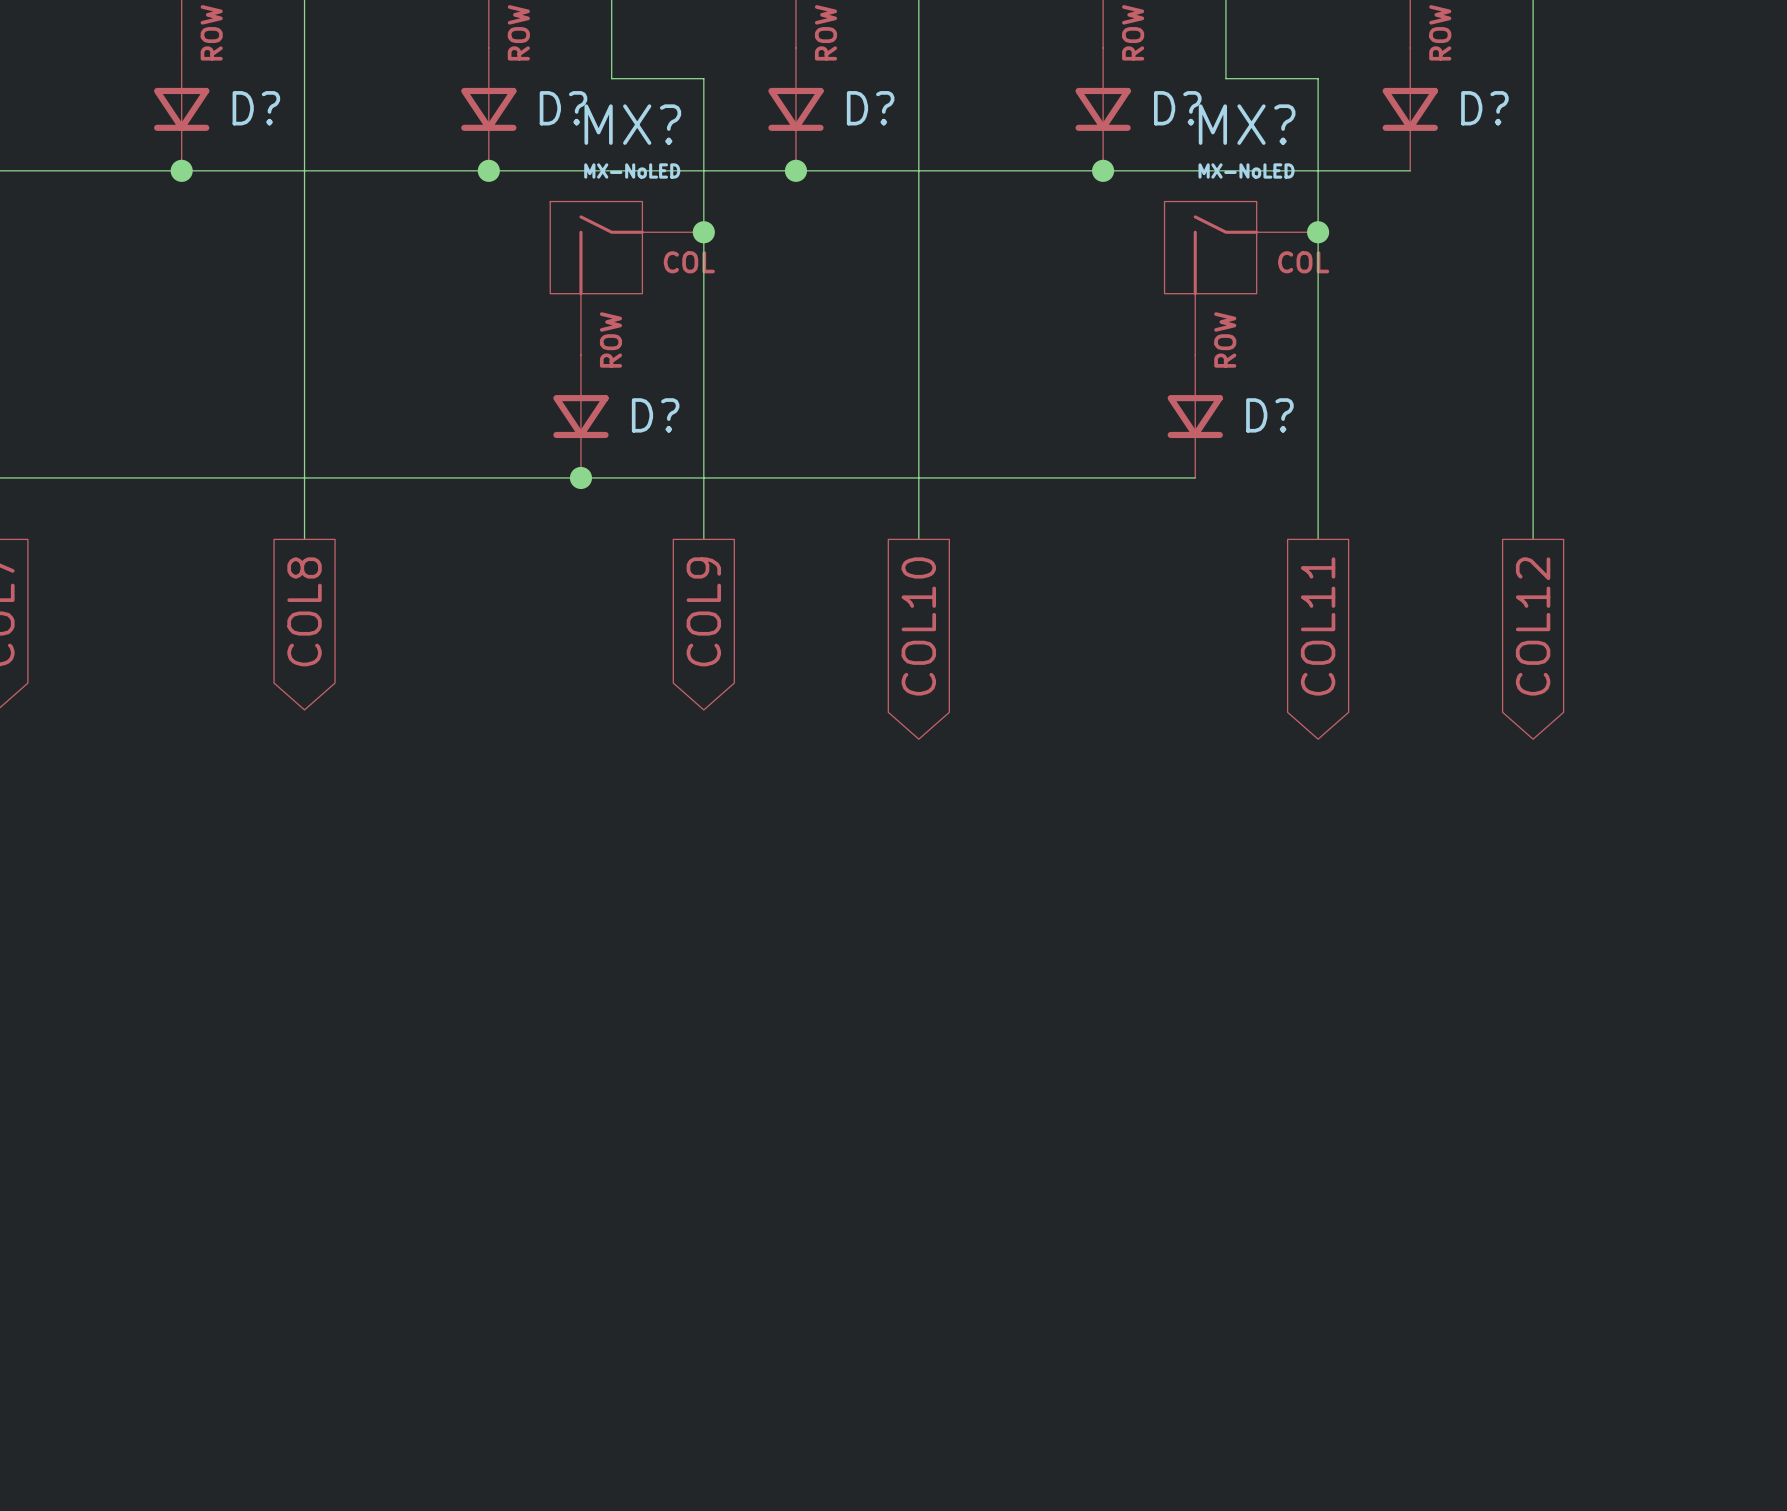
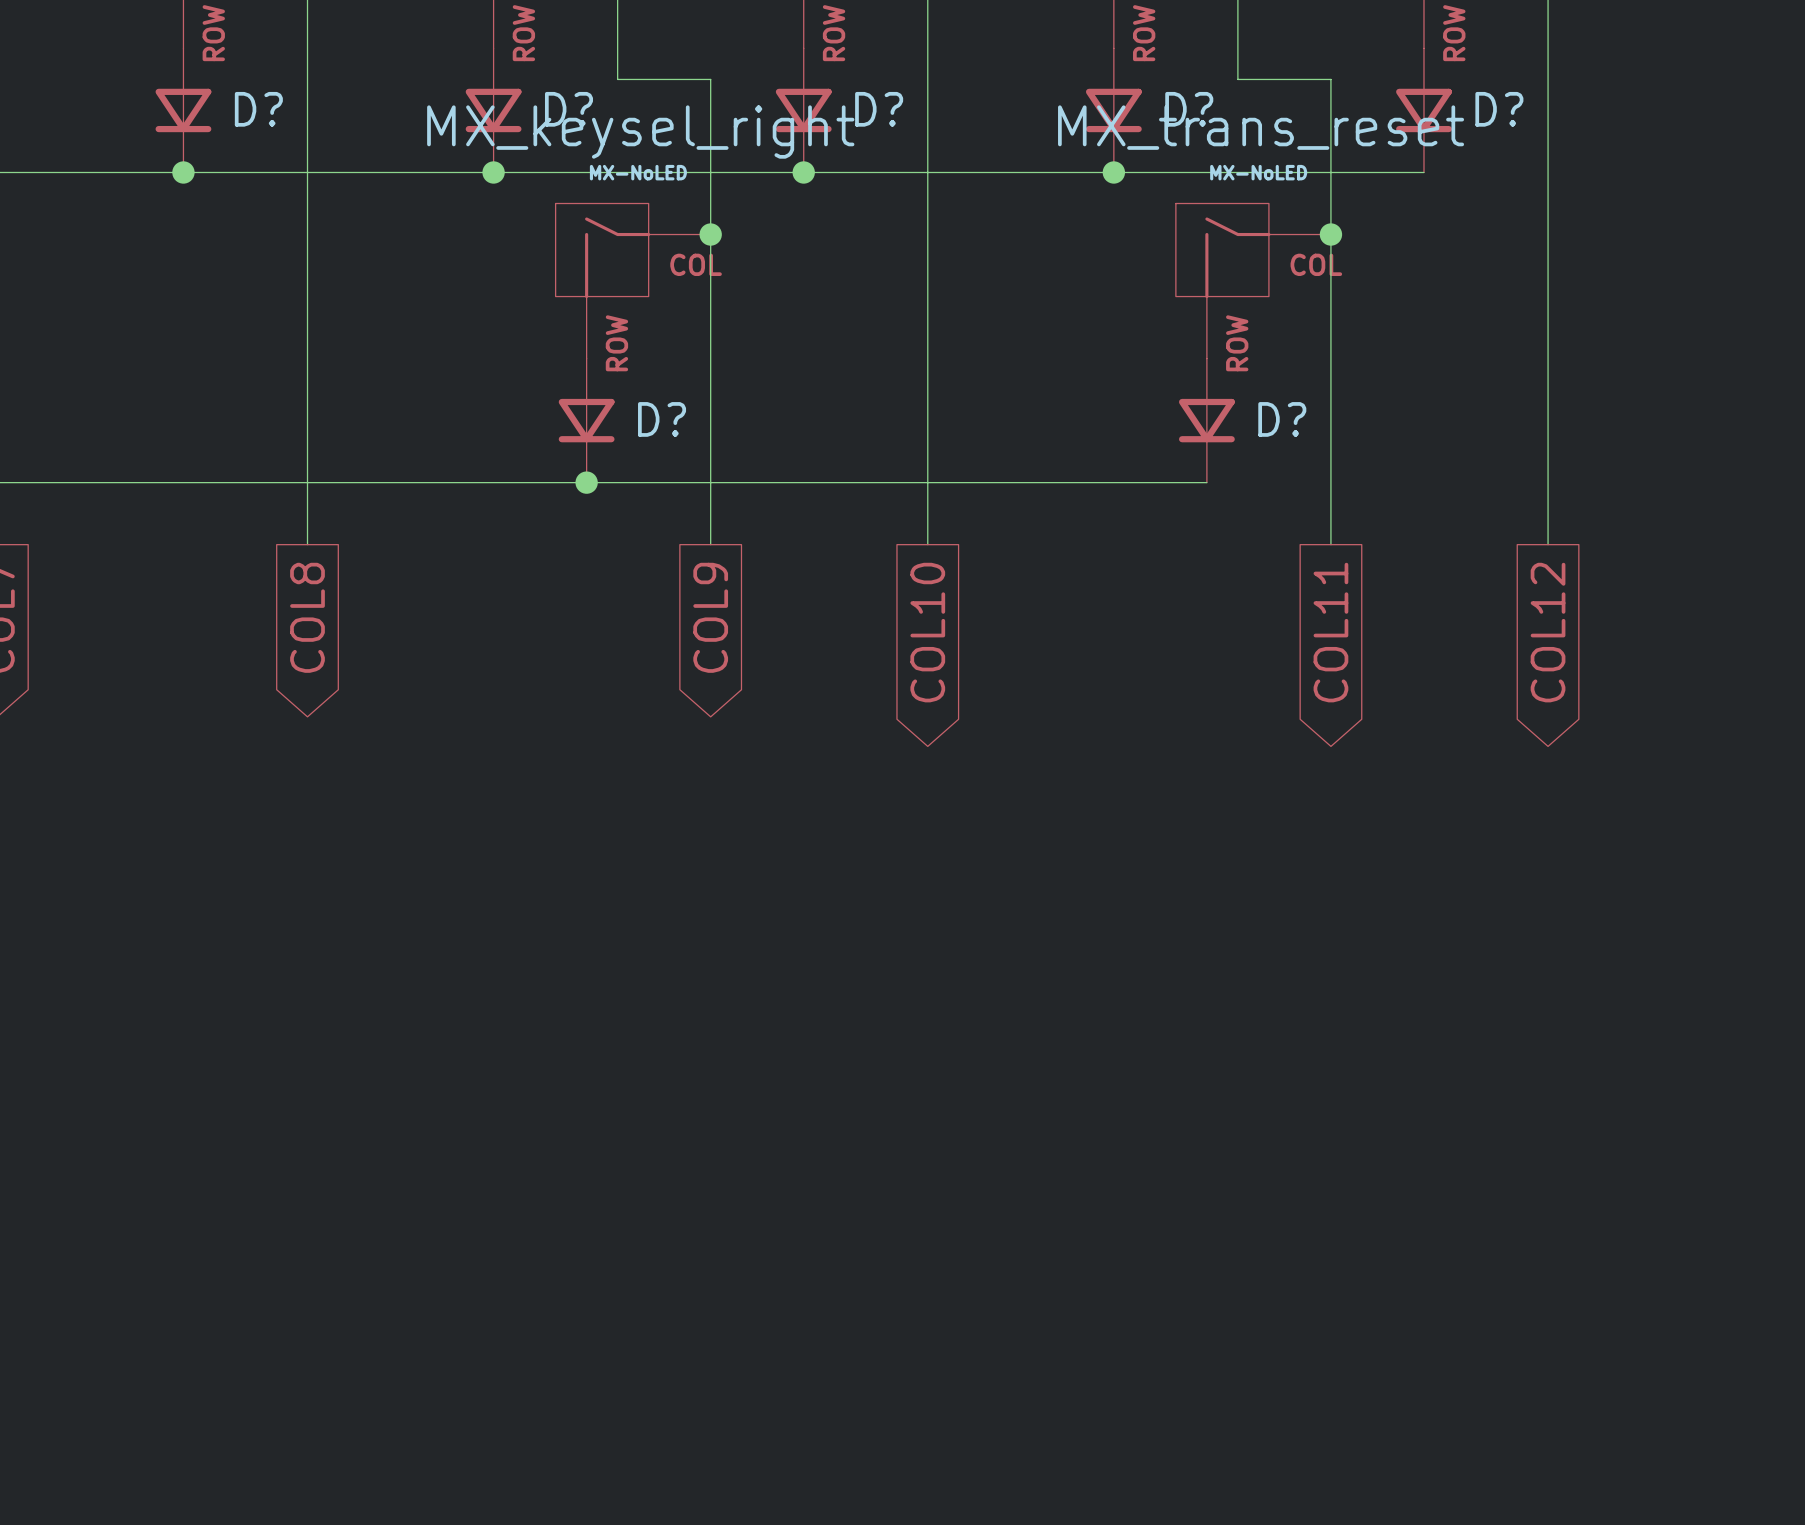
MX? name: MX? (632, 124) -> MX_keysel_right (640, 132)
MX? name: MX? (1247, 124) -> MX_trans_reset (1261, 127)

